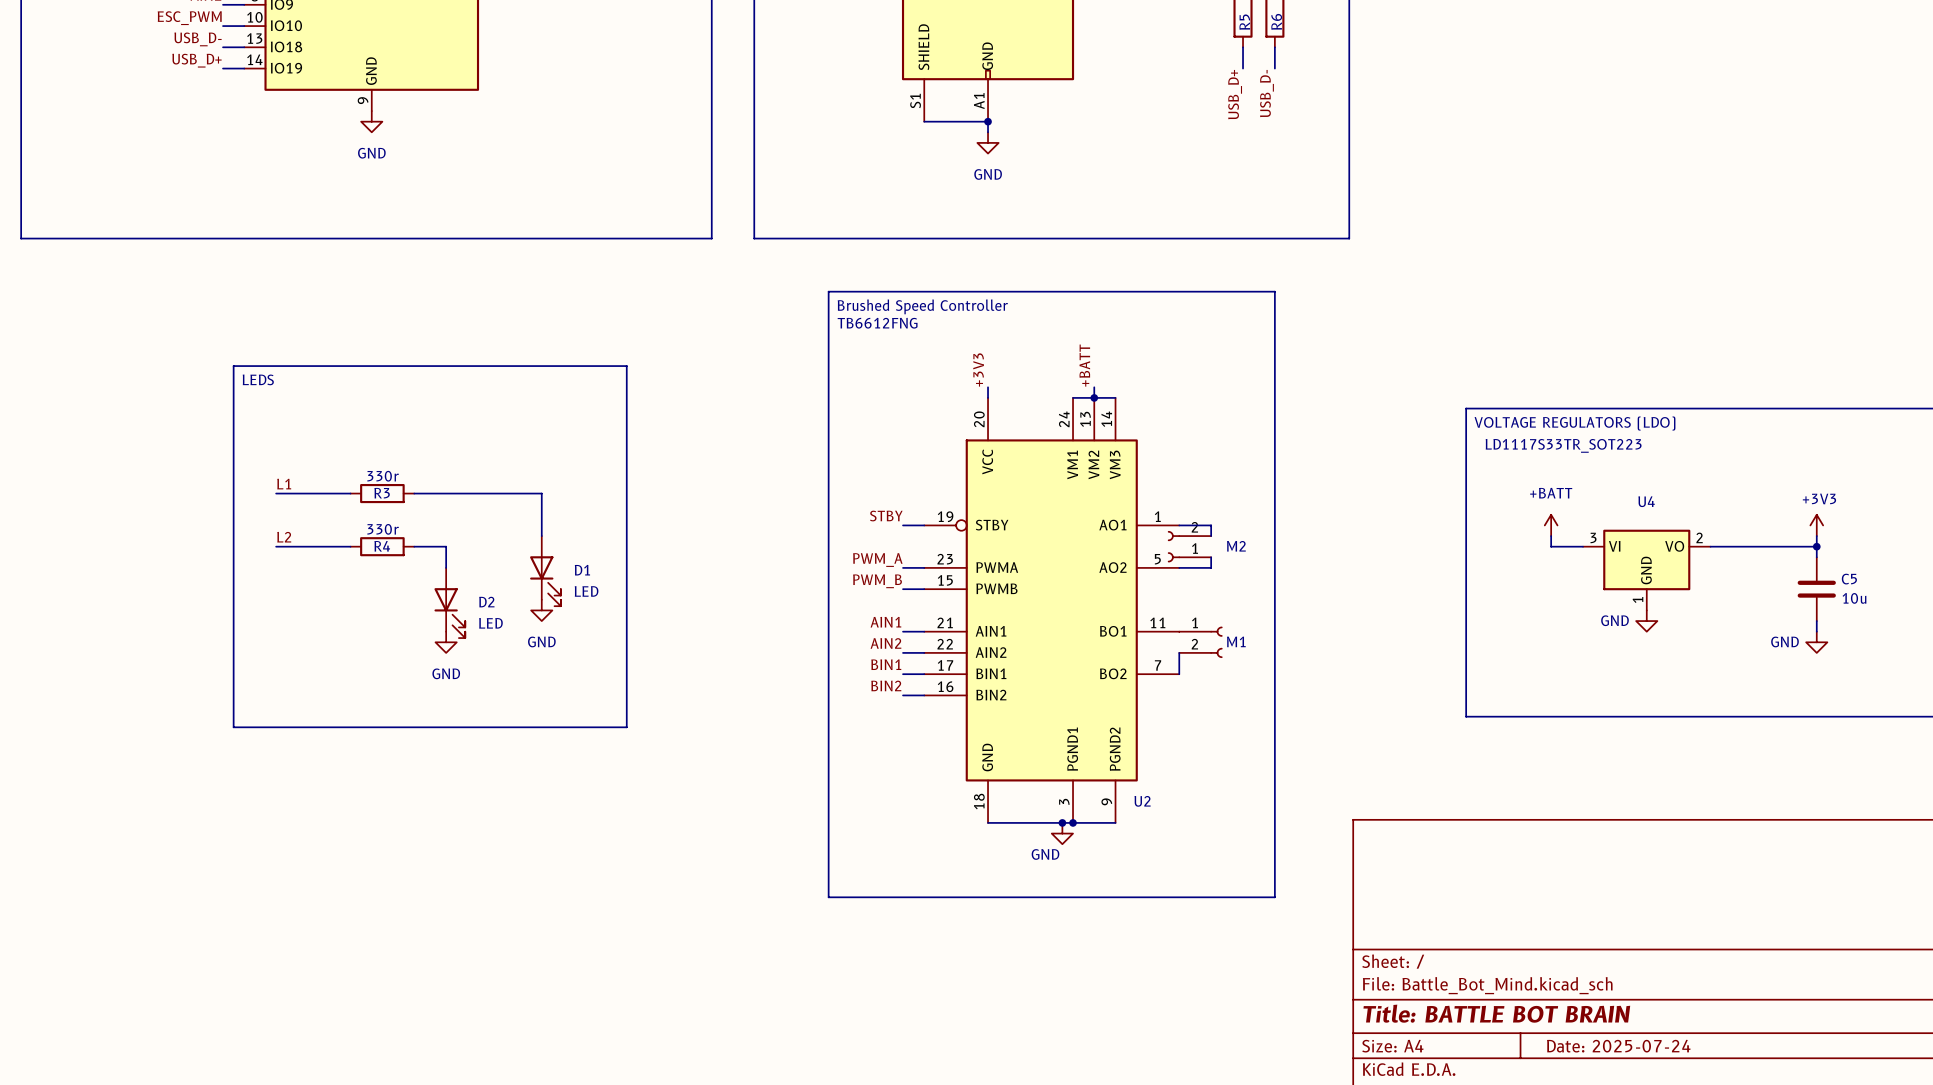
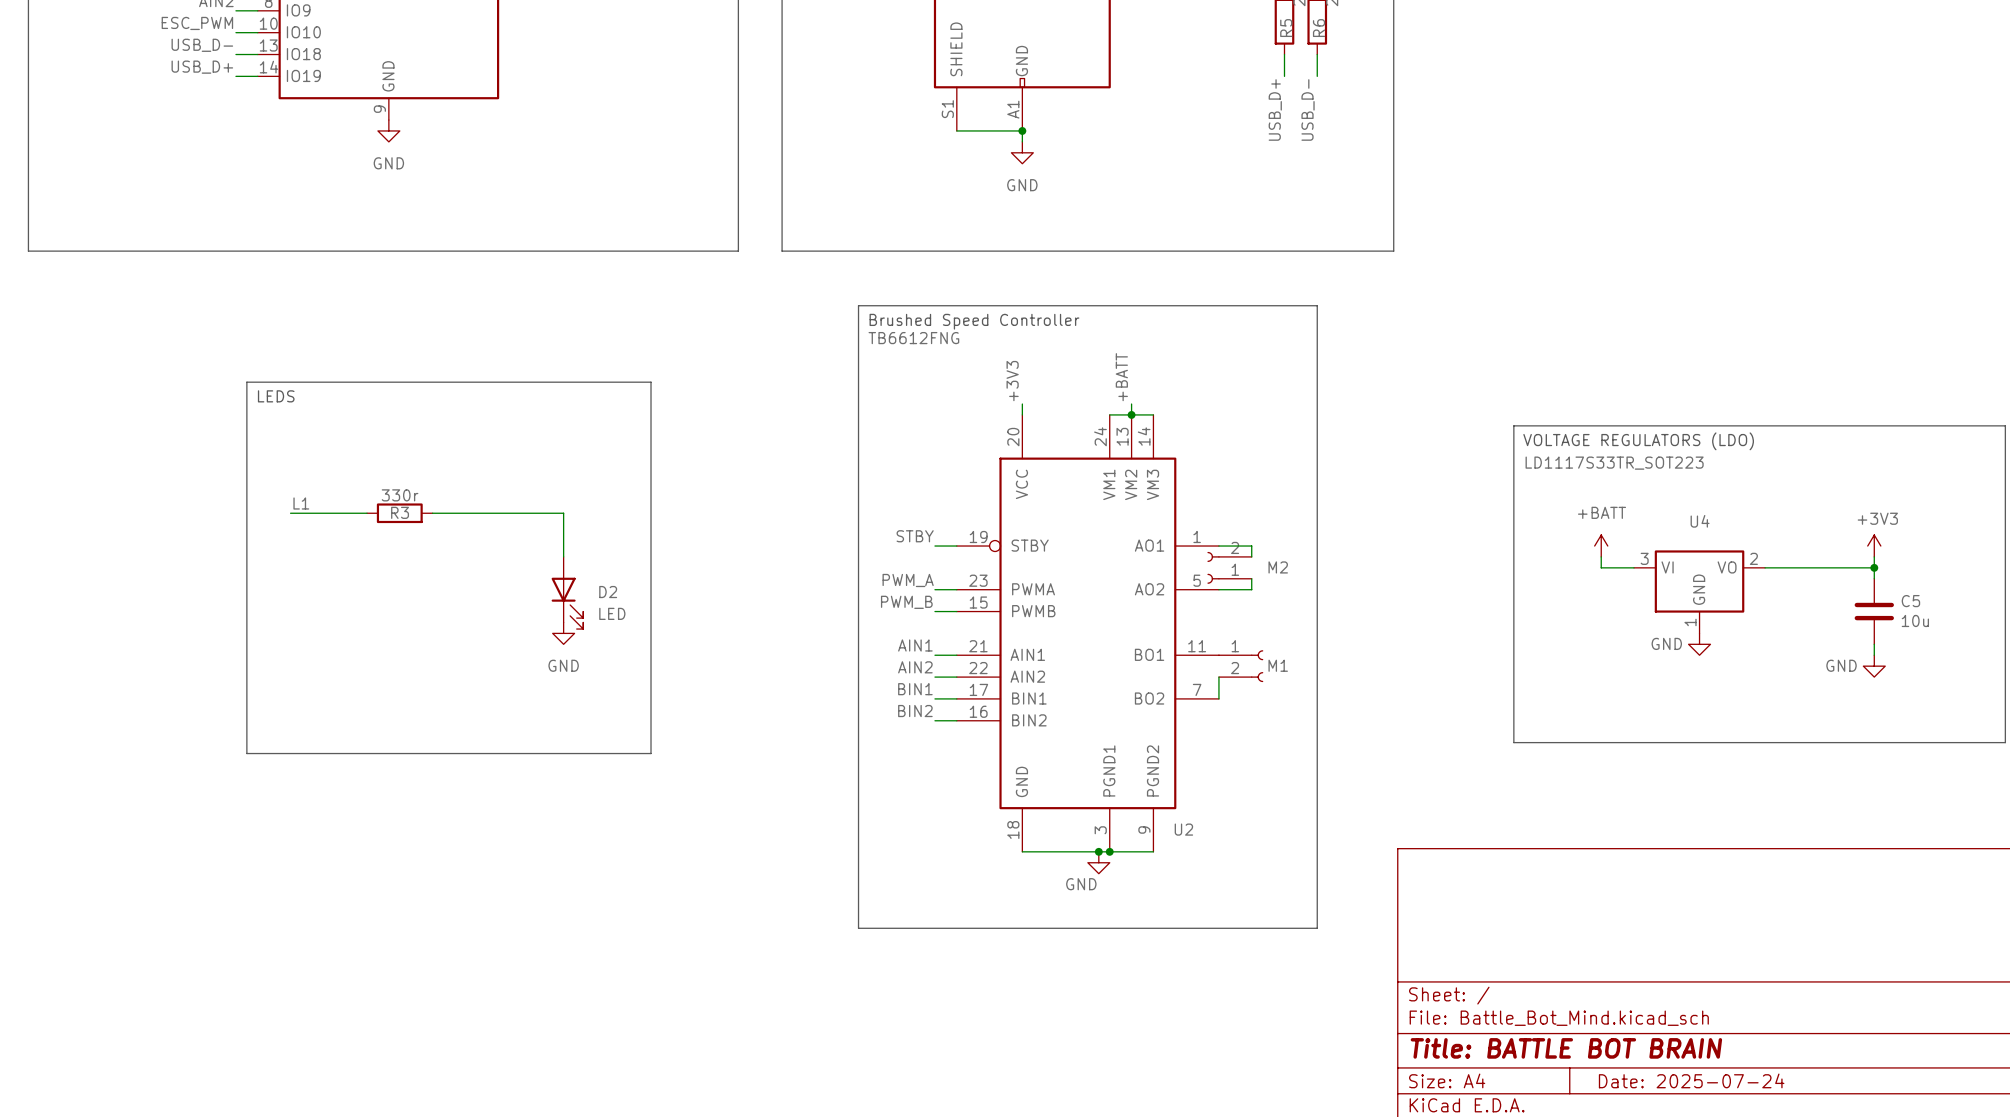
label: L2 (284, 537) -> none
wire: (276, 546) (350, 546) -> none
R4: 330r (382, 546) -> none
wire: (414, 546) (446, 546) (446, 567) -> none
D1 name: D1 (582, 570) -> D2 (608, 592)
D2: LED (449, 602) -> none
power symbol: GND (446, 642) -> none

